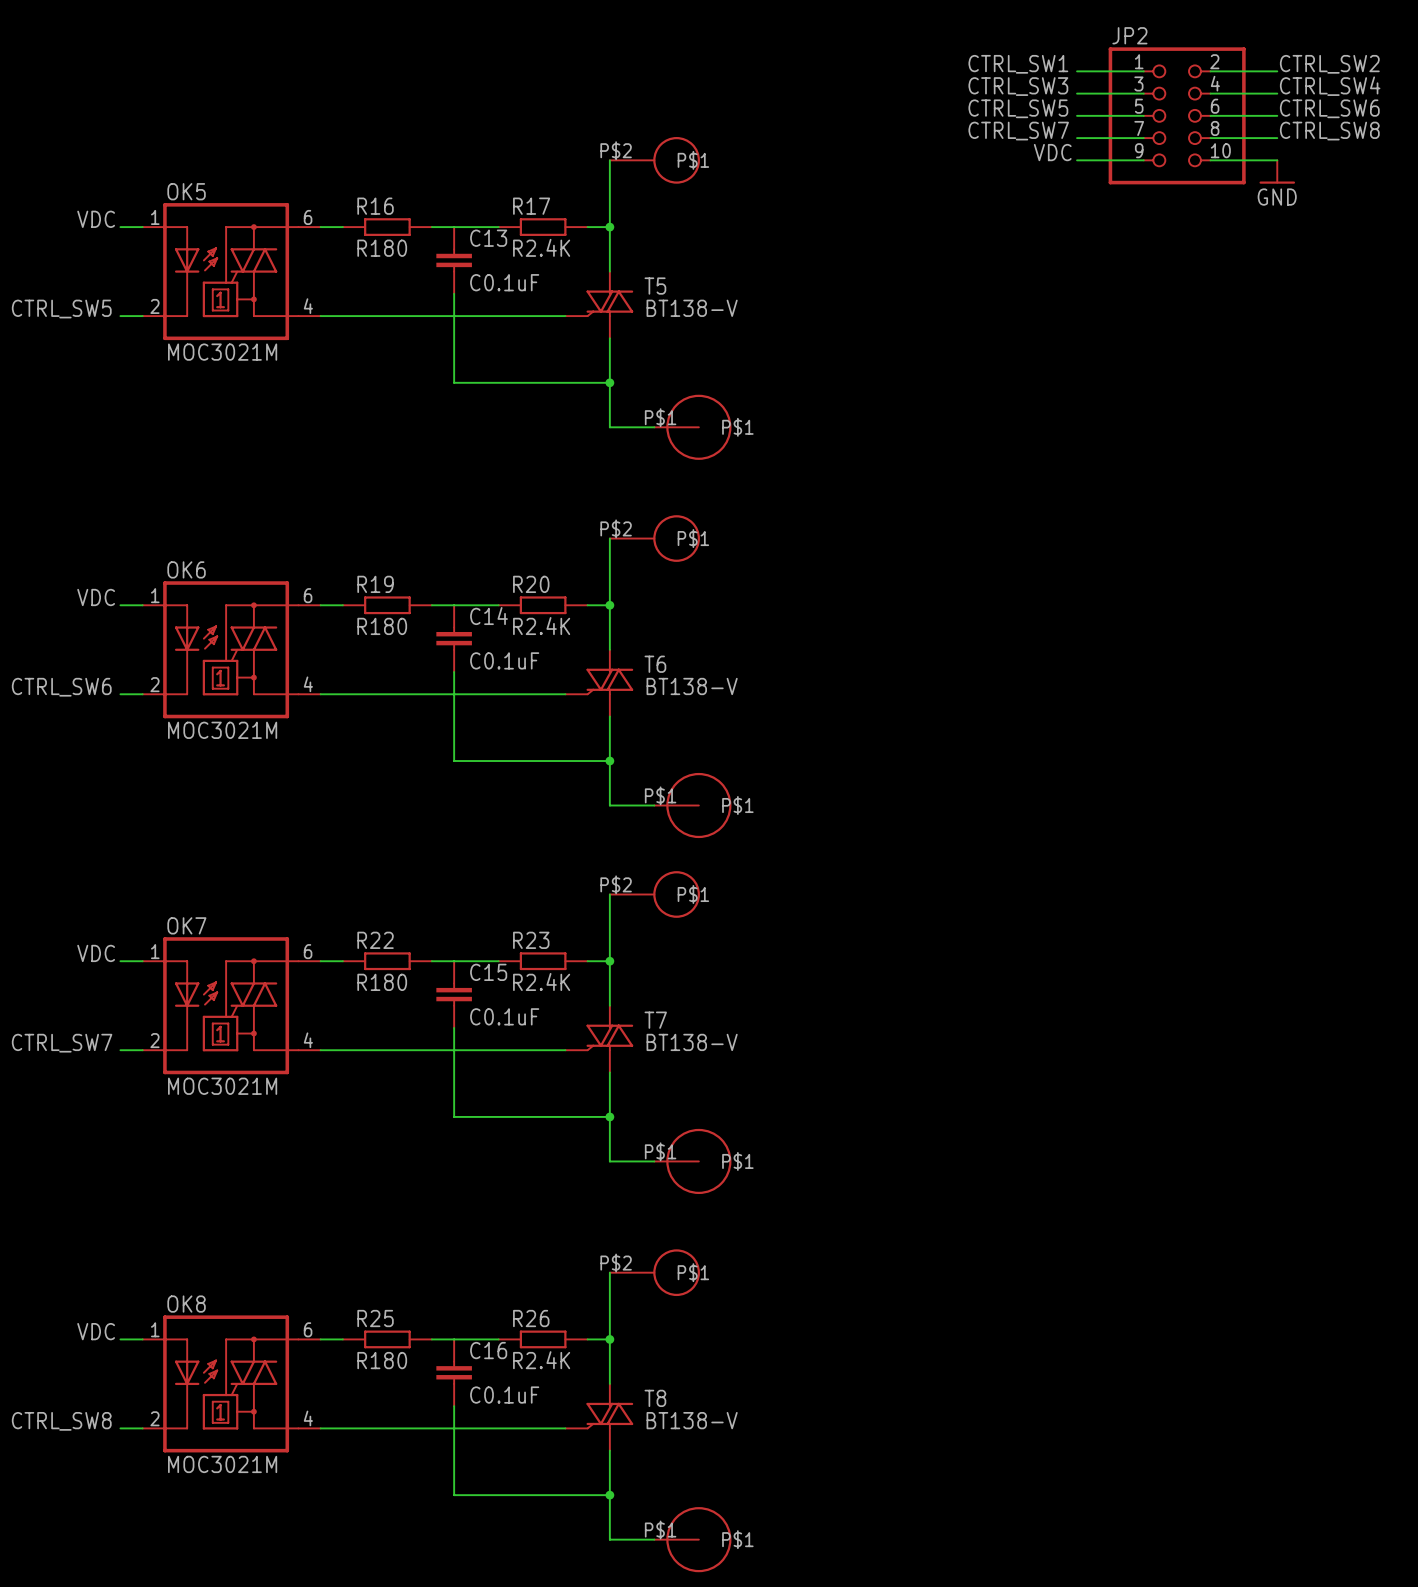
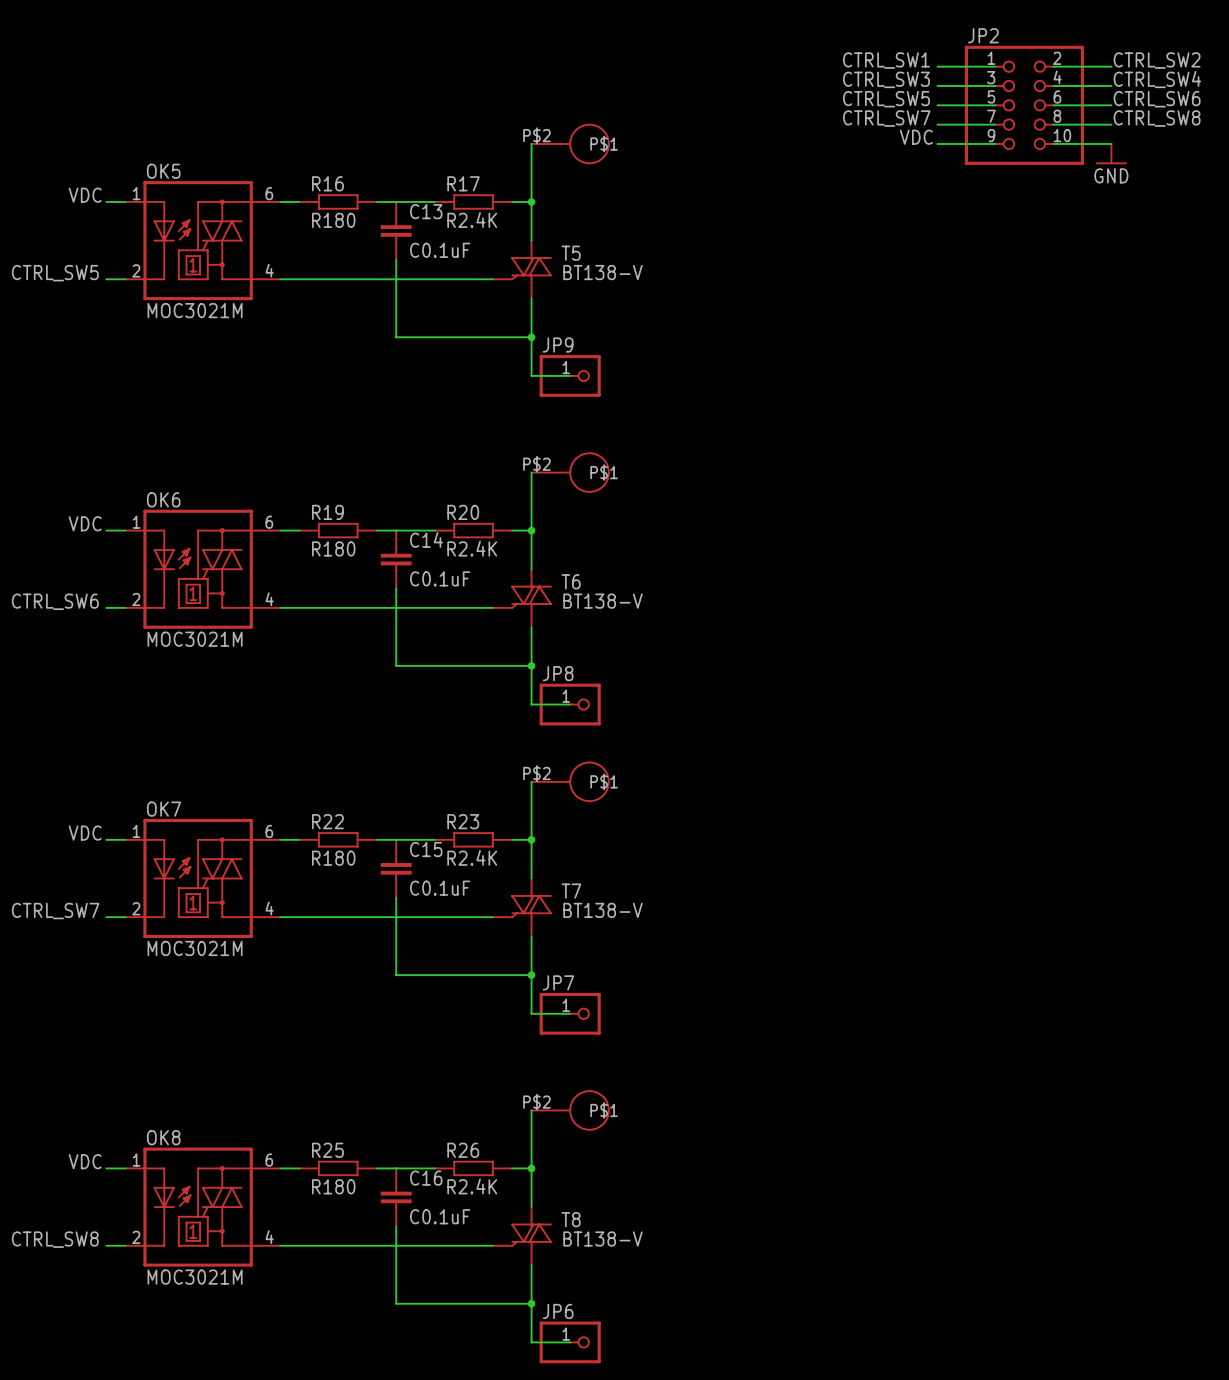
JP9: none -> (570, 375)
part: (692, 427) -> none
JP8: none -> (570, 704)
part: (692, 805) -> none
JP7: none -> (570, 1013)
part: (692, 1161) -> none
JP6: none -> (570, 1342)
part: (692, 1539) -> none

